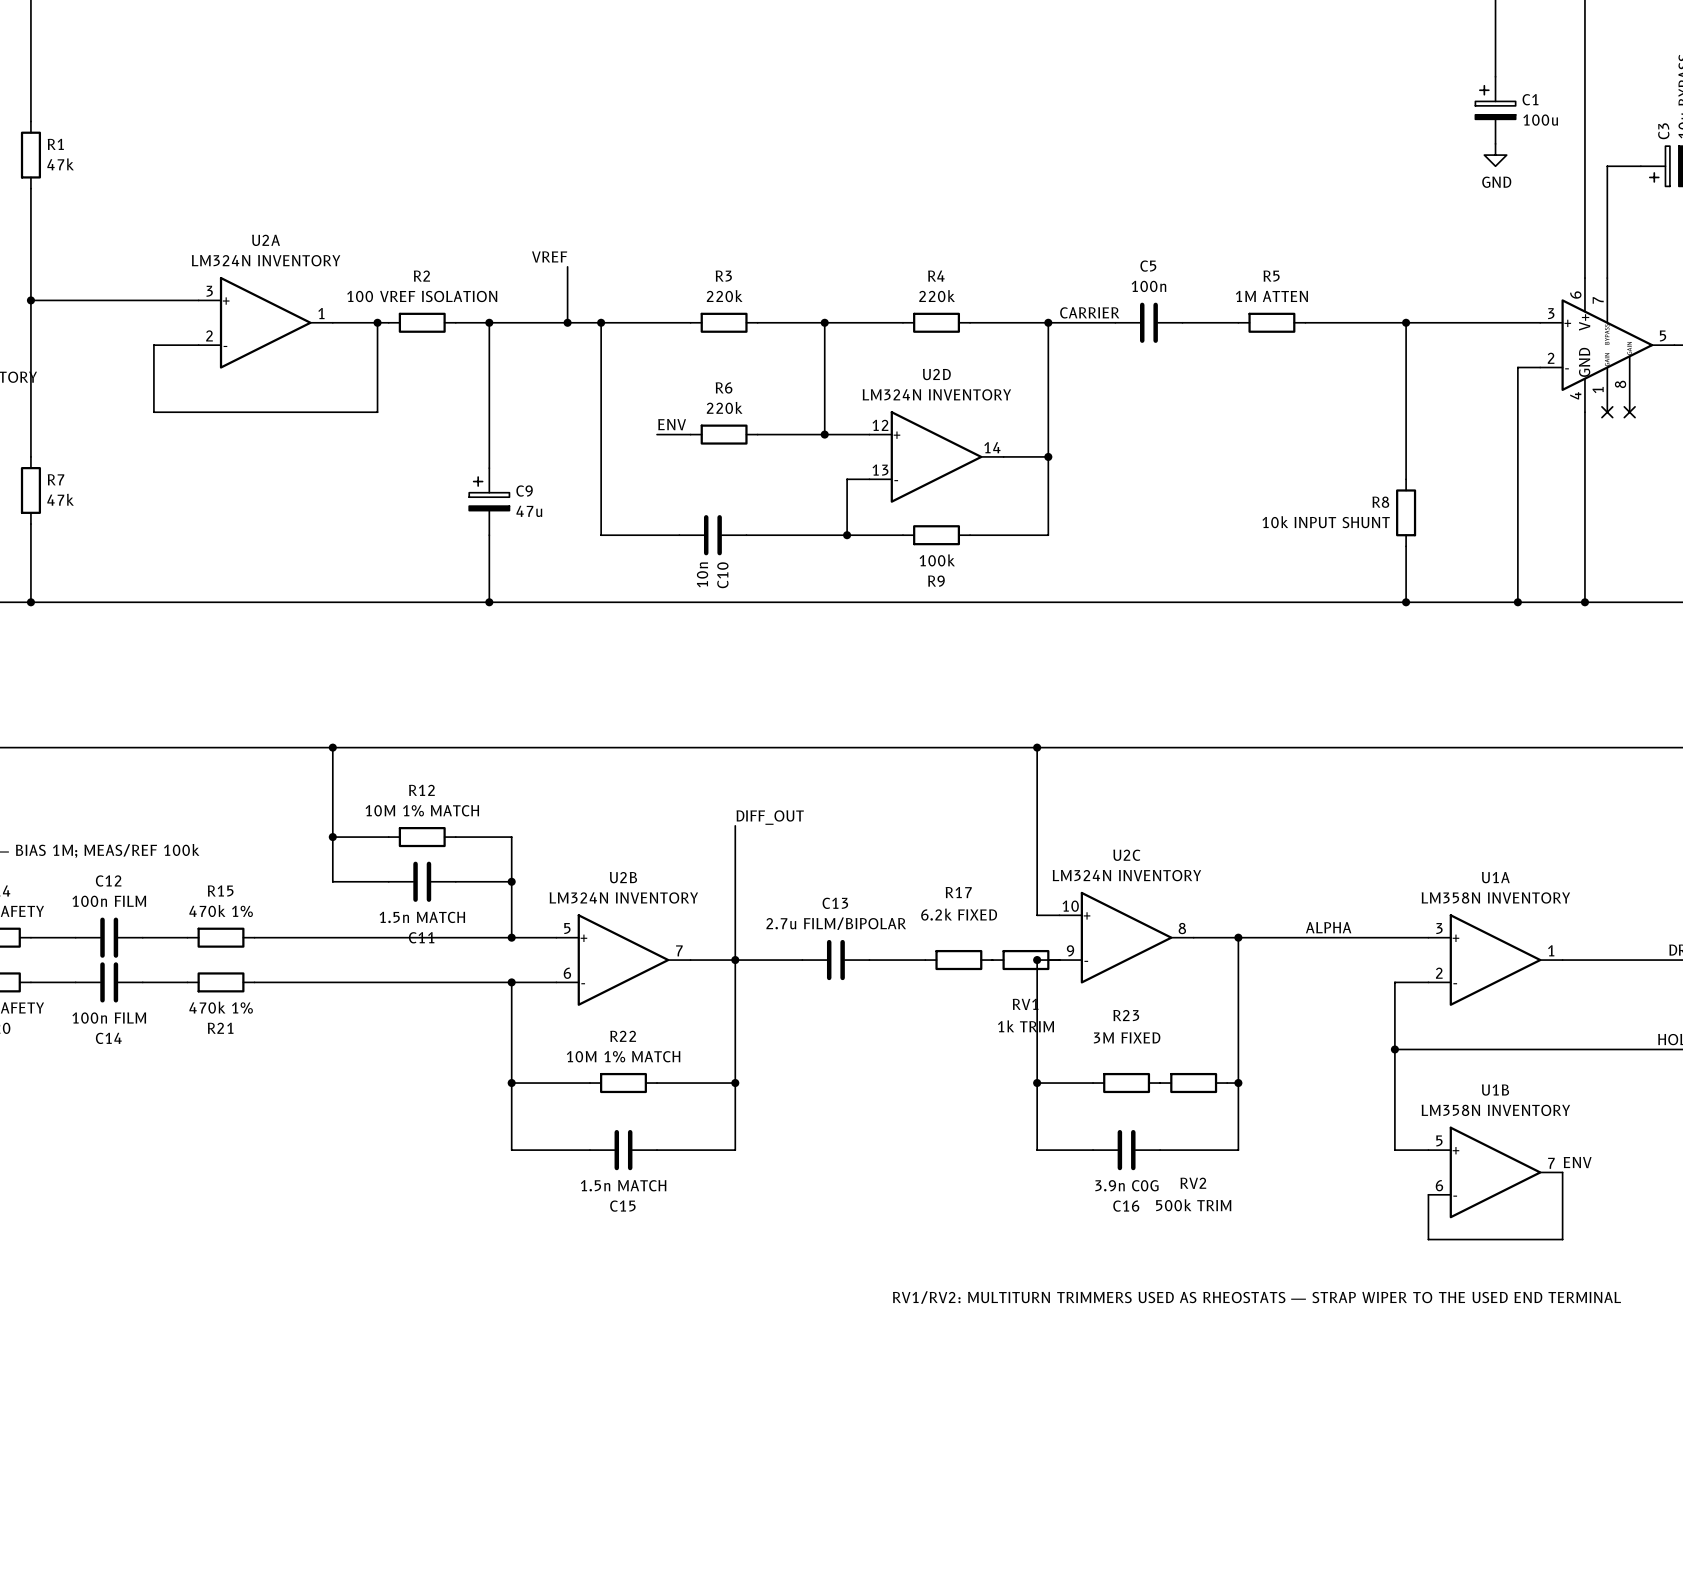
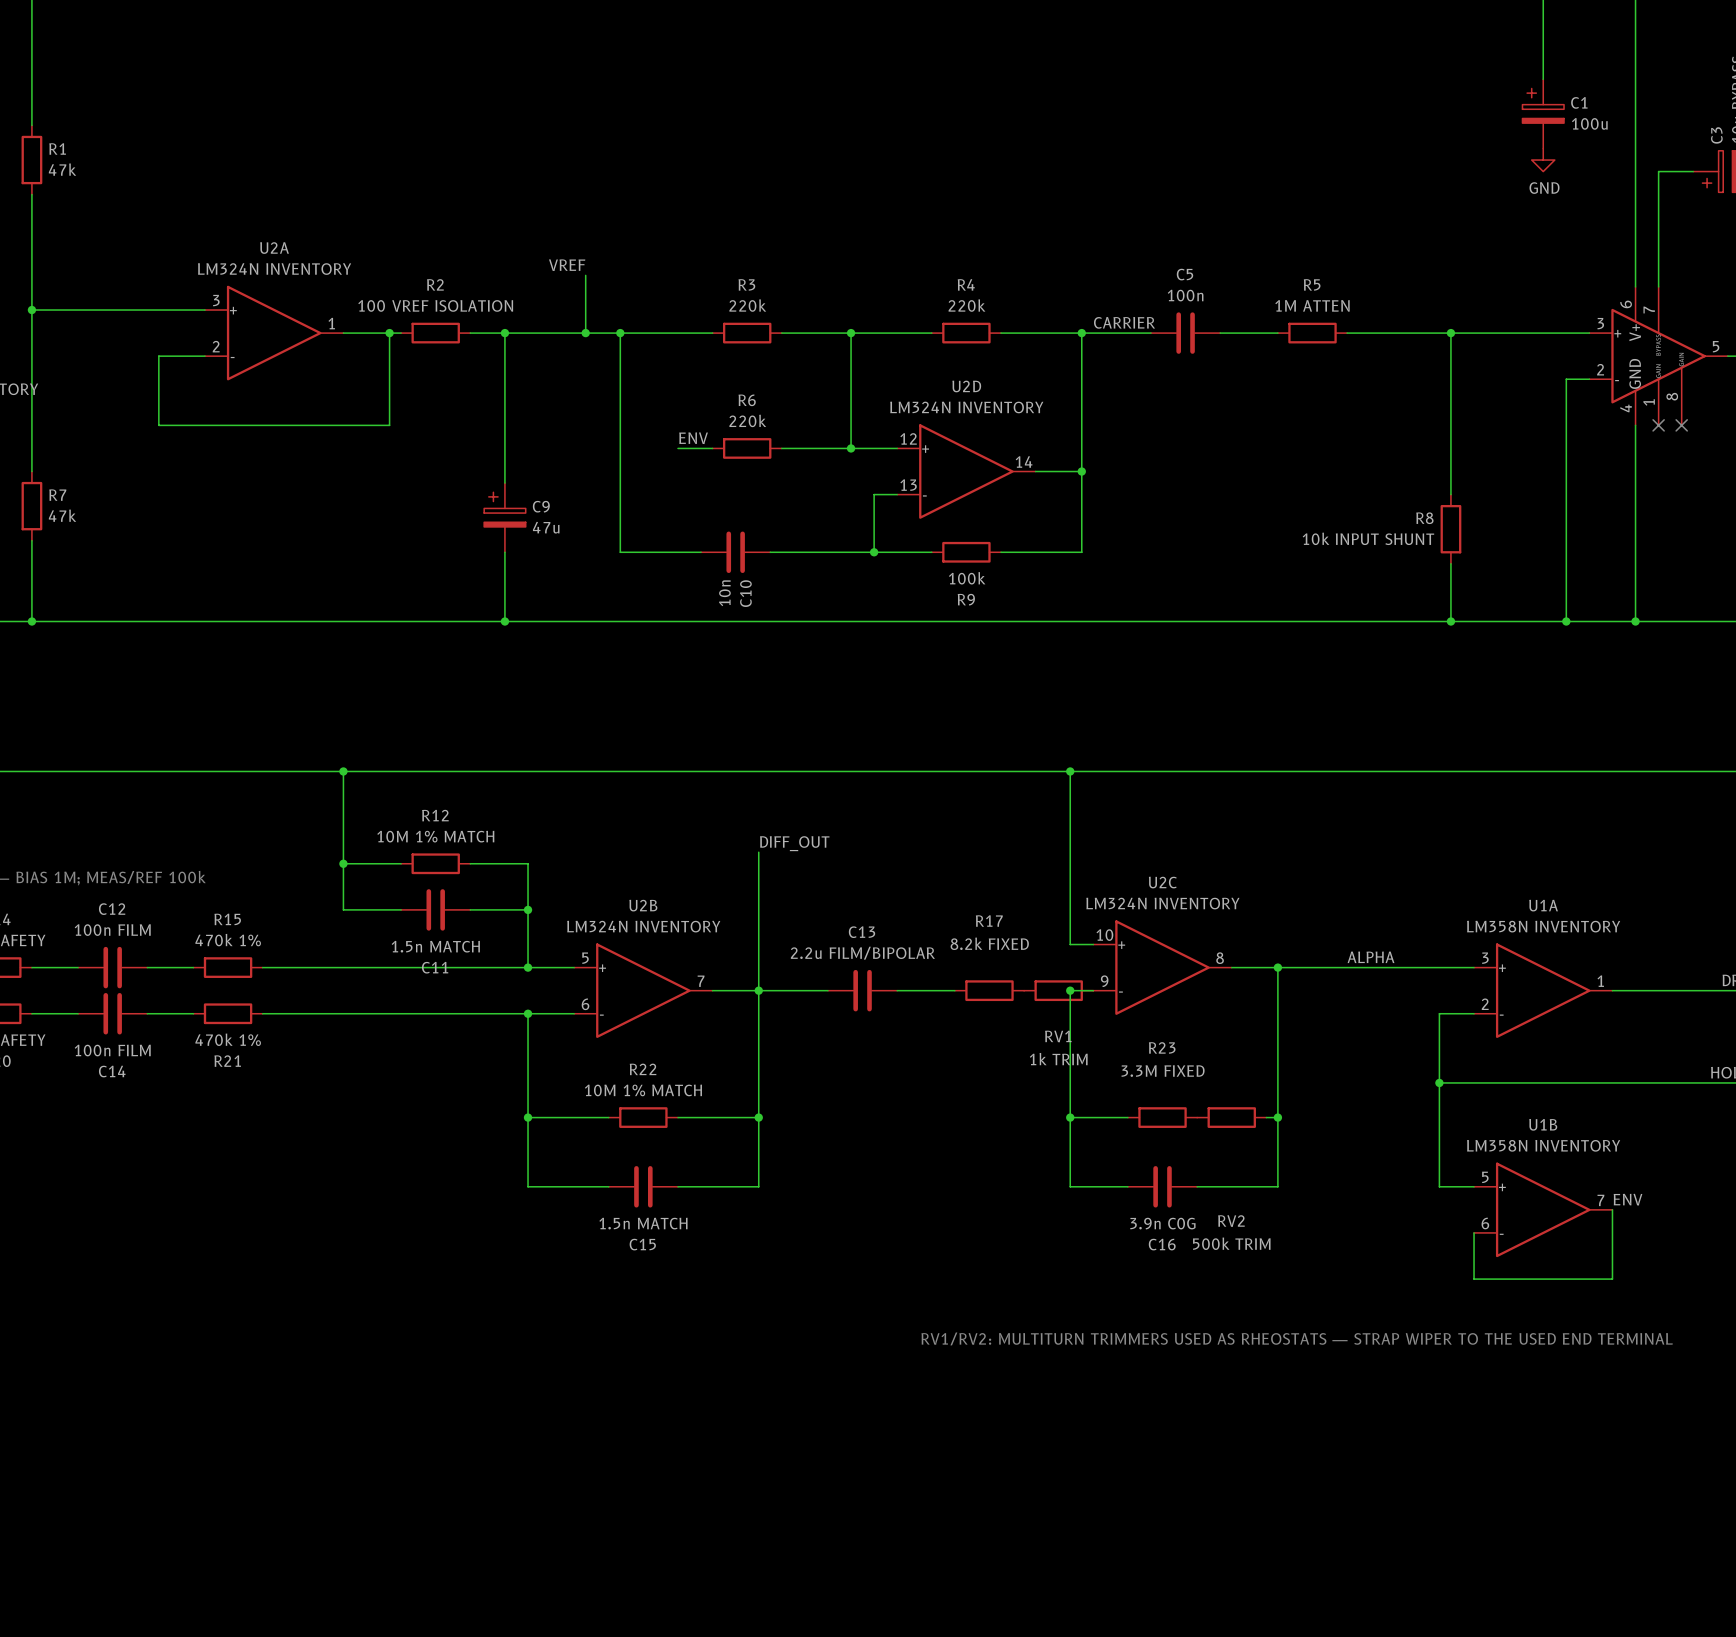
R17 value: 6.2k FIXED (959, 914) -> 8.2k FIXED (989, 943)
C13 value: 2.7u FILM/BIPOLAR (836, 923) -> 2.2u FILM/BIPOLAR (862, 953)
R23 value: 3M FIXED (1127, 1037) -> 3.3M FIXED (1163, 1071)

